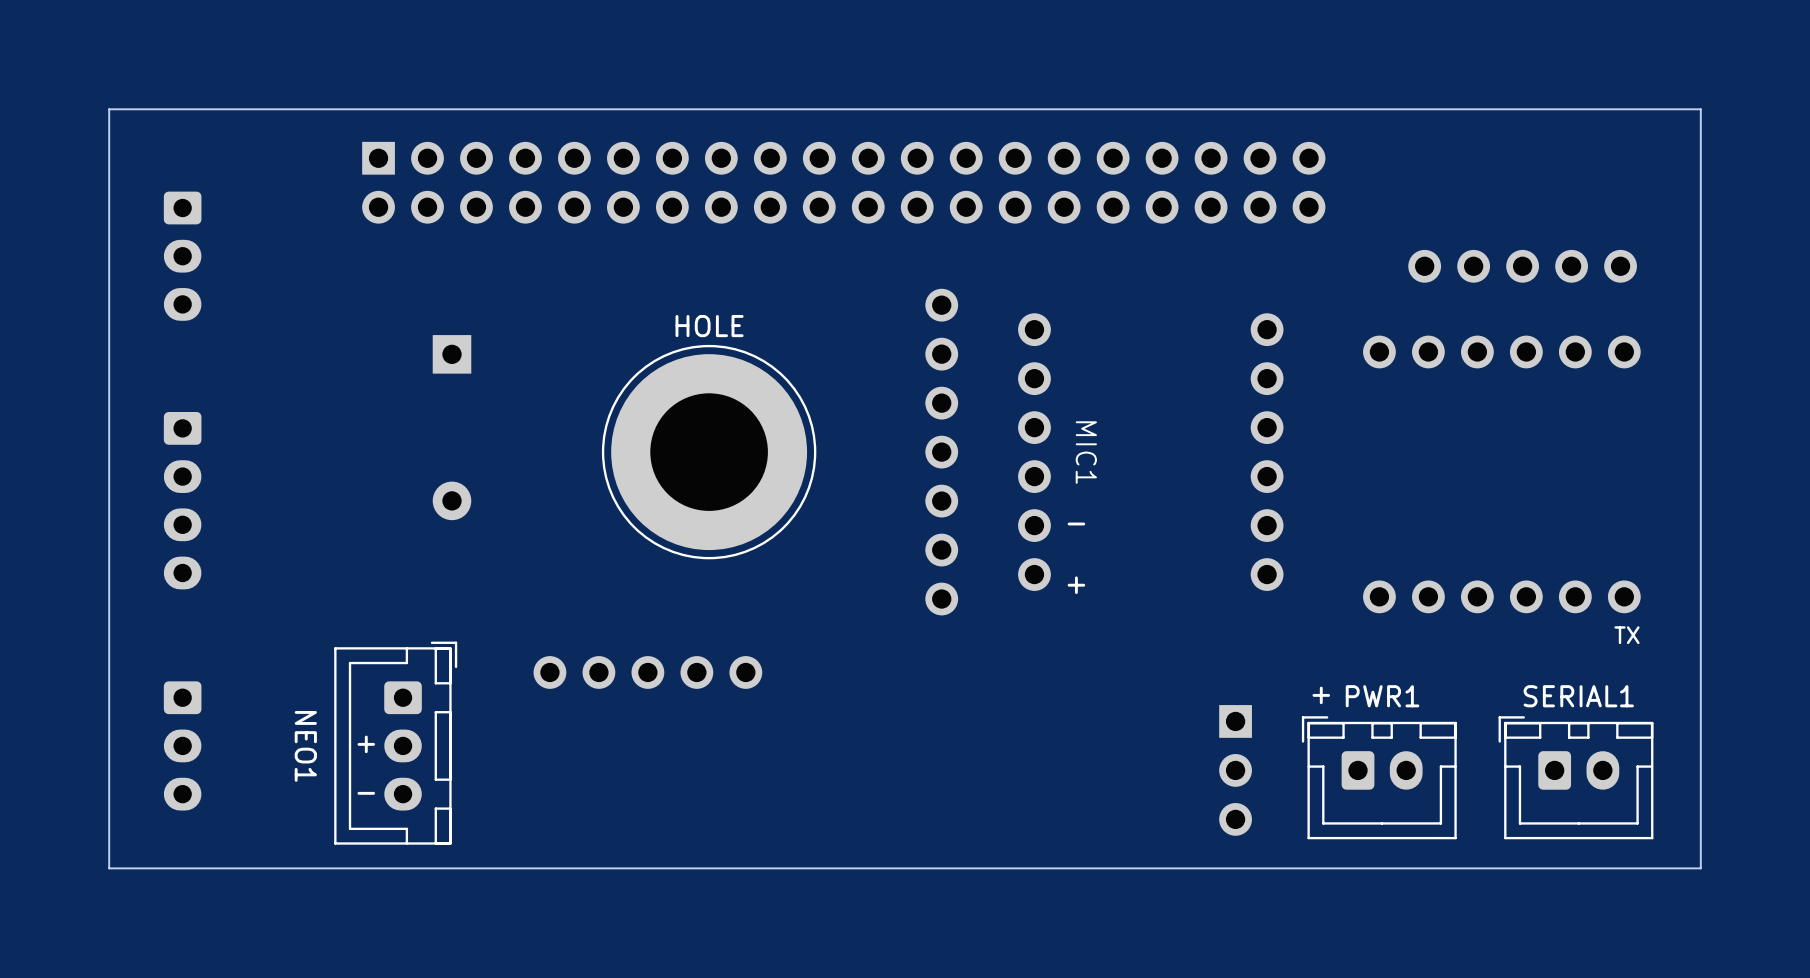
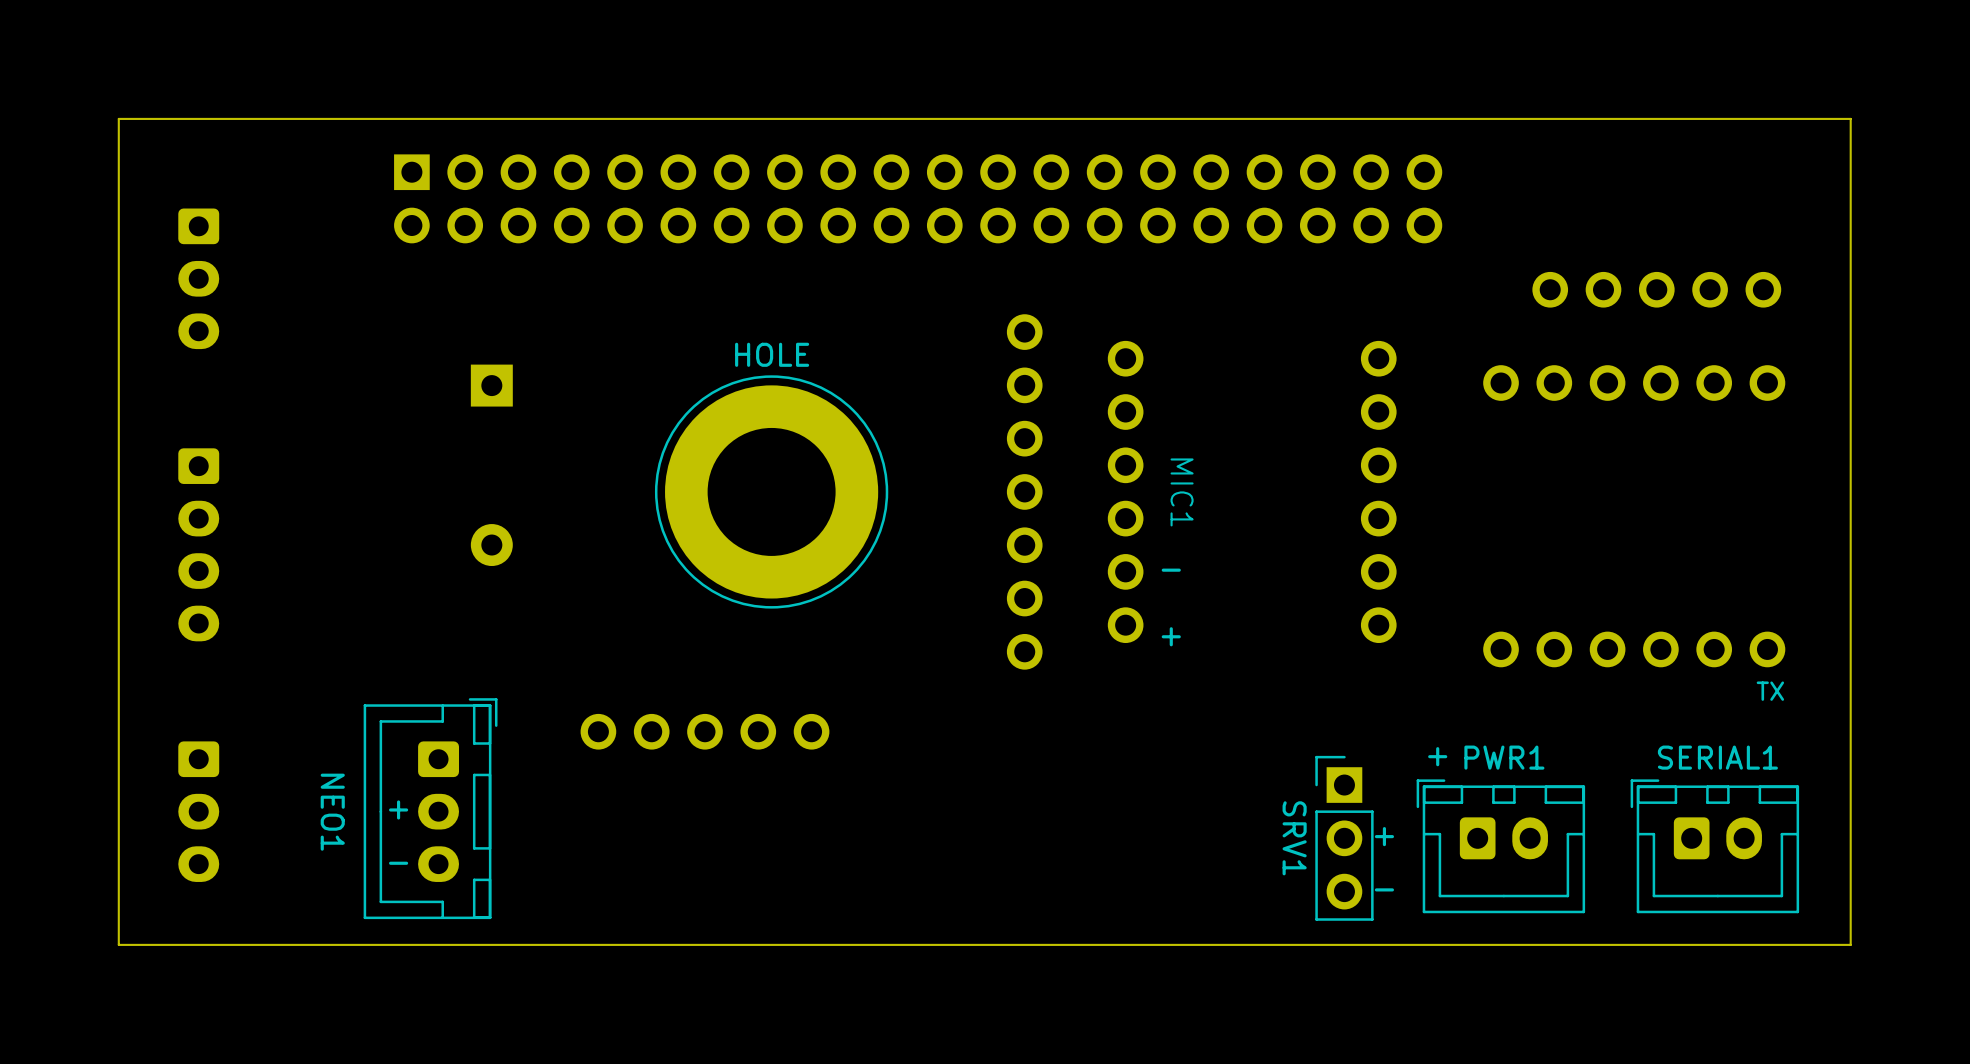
text: none -> + (1384, 836)
SRV1 side: top (1235, 770) -> bottom (1344, 838)
text: none -> - (1384, 889)

